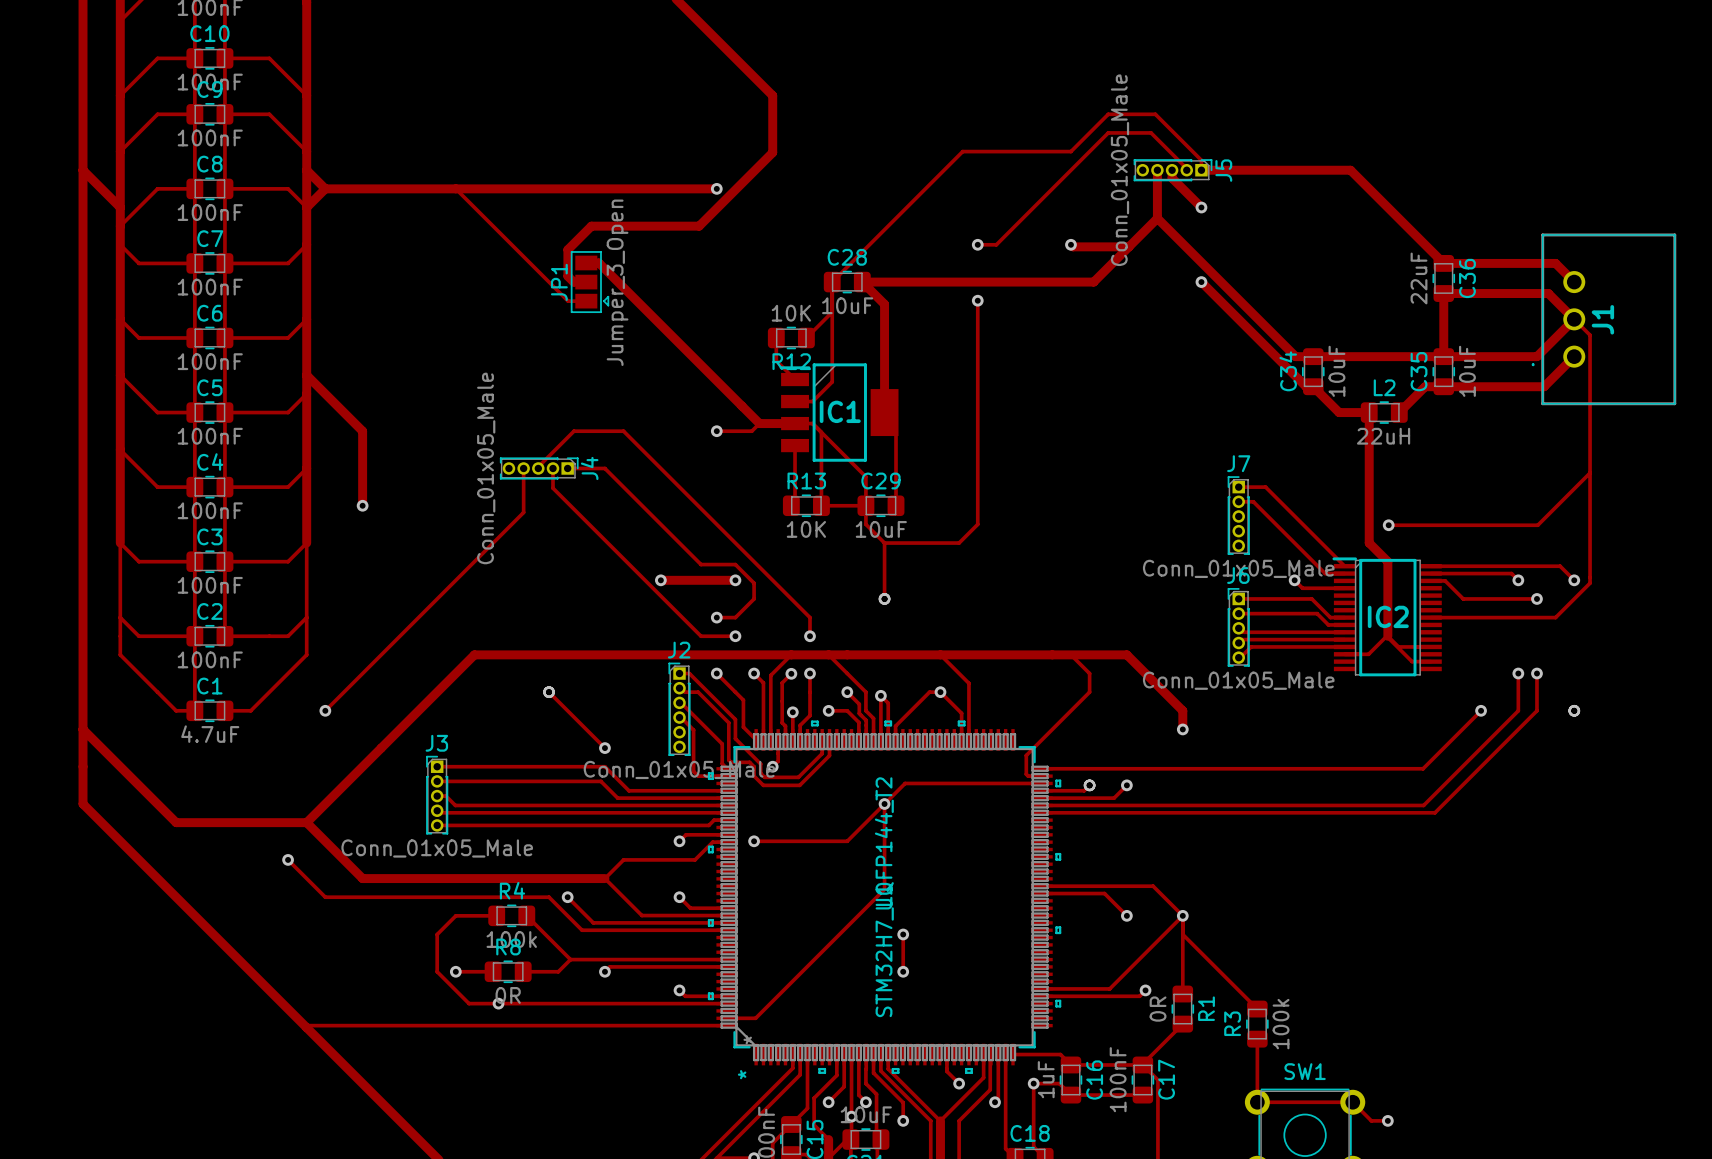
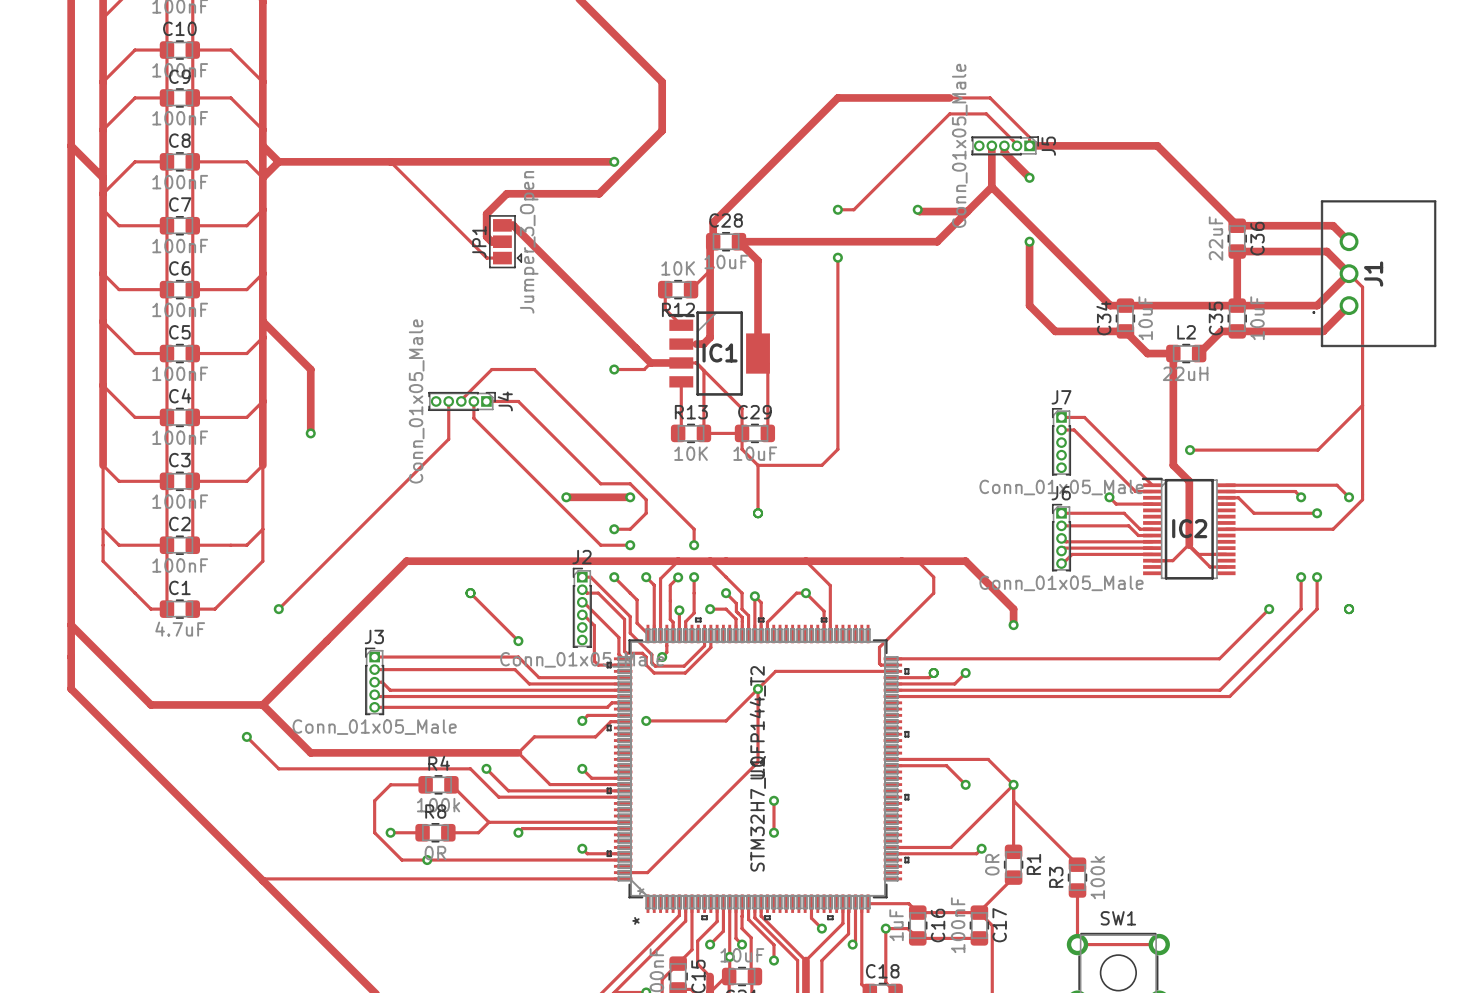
track: (1108, 114) (1070, 151) (962, 151) (832, 282) (832, 381) (812, 401) -> (949, 97) (837, 97) (713, 222) (713, 241) (710, 244) (710, 337) (703, 344) (696, 344)
track: (1201, 282) (1306, 386) -> (1029, 241) (1029, 305) (1055, 331) (1119, 331)
track: (1352, 1102) (1371, 1120) (1387, 1120) -> none
via: (1387, 1120) -> none

